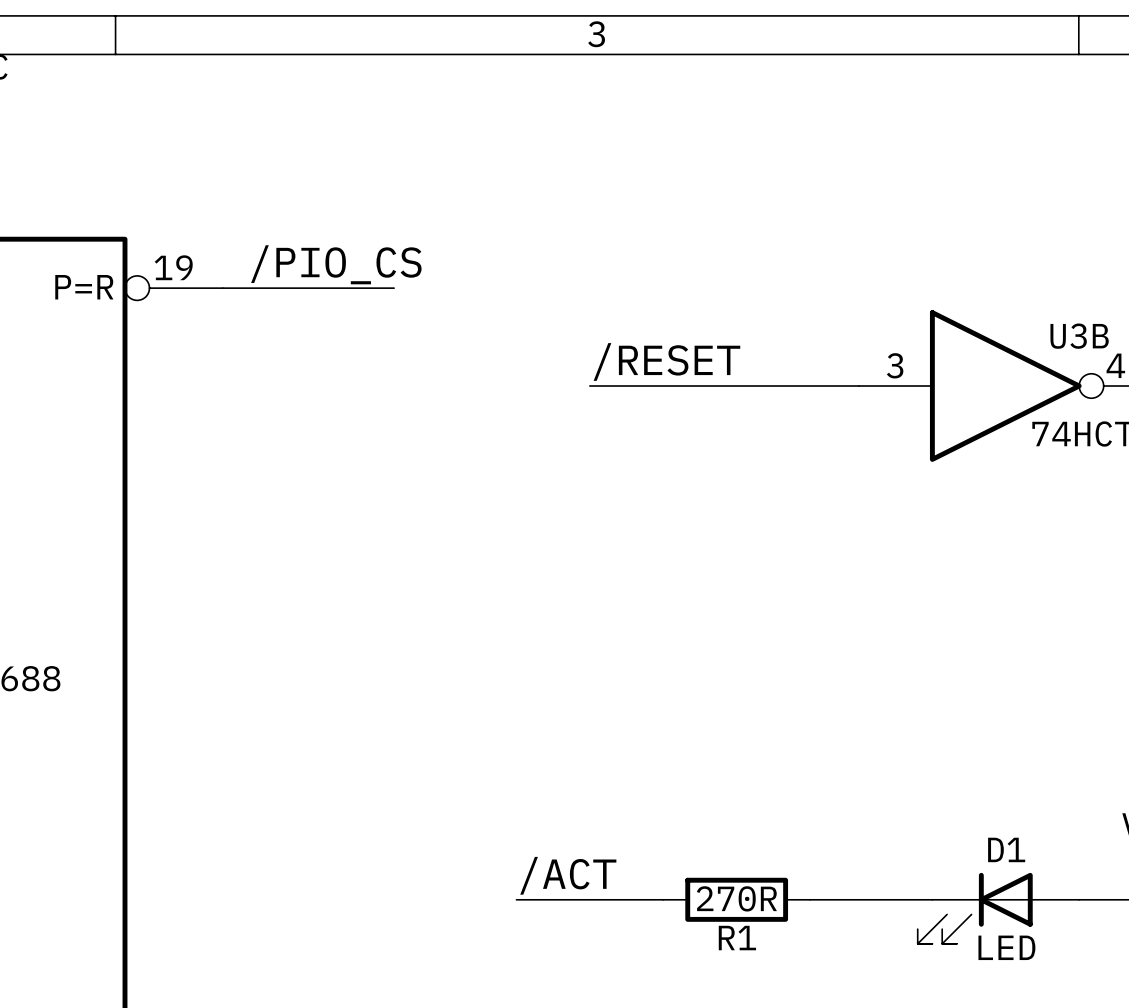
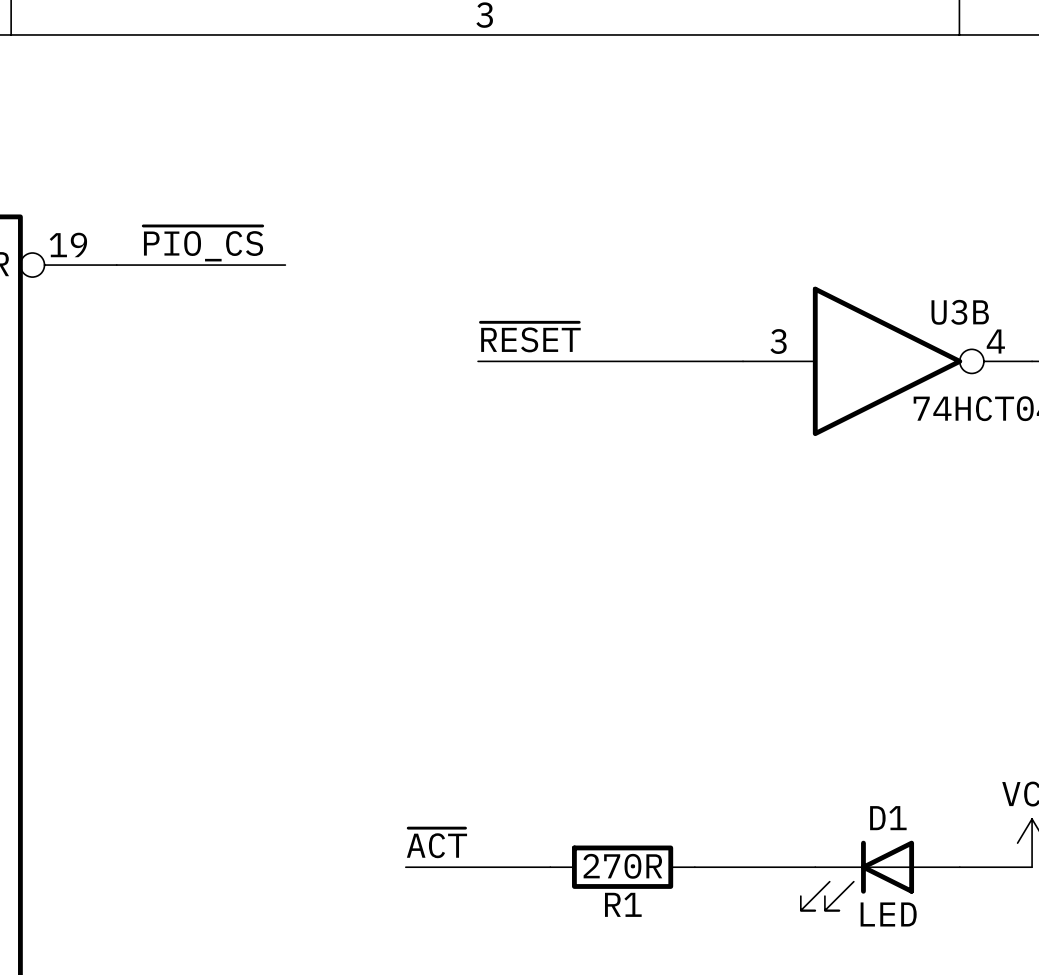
label: /PIO_CS (336, 264) -> ~{PIO_CS} (203, 243)
label: /RESET (666, 361) -> ~{RESET} (530, 337)
label: /ACT (568, 875) -> ~{ACT} (436, 843)

